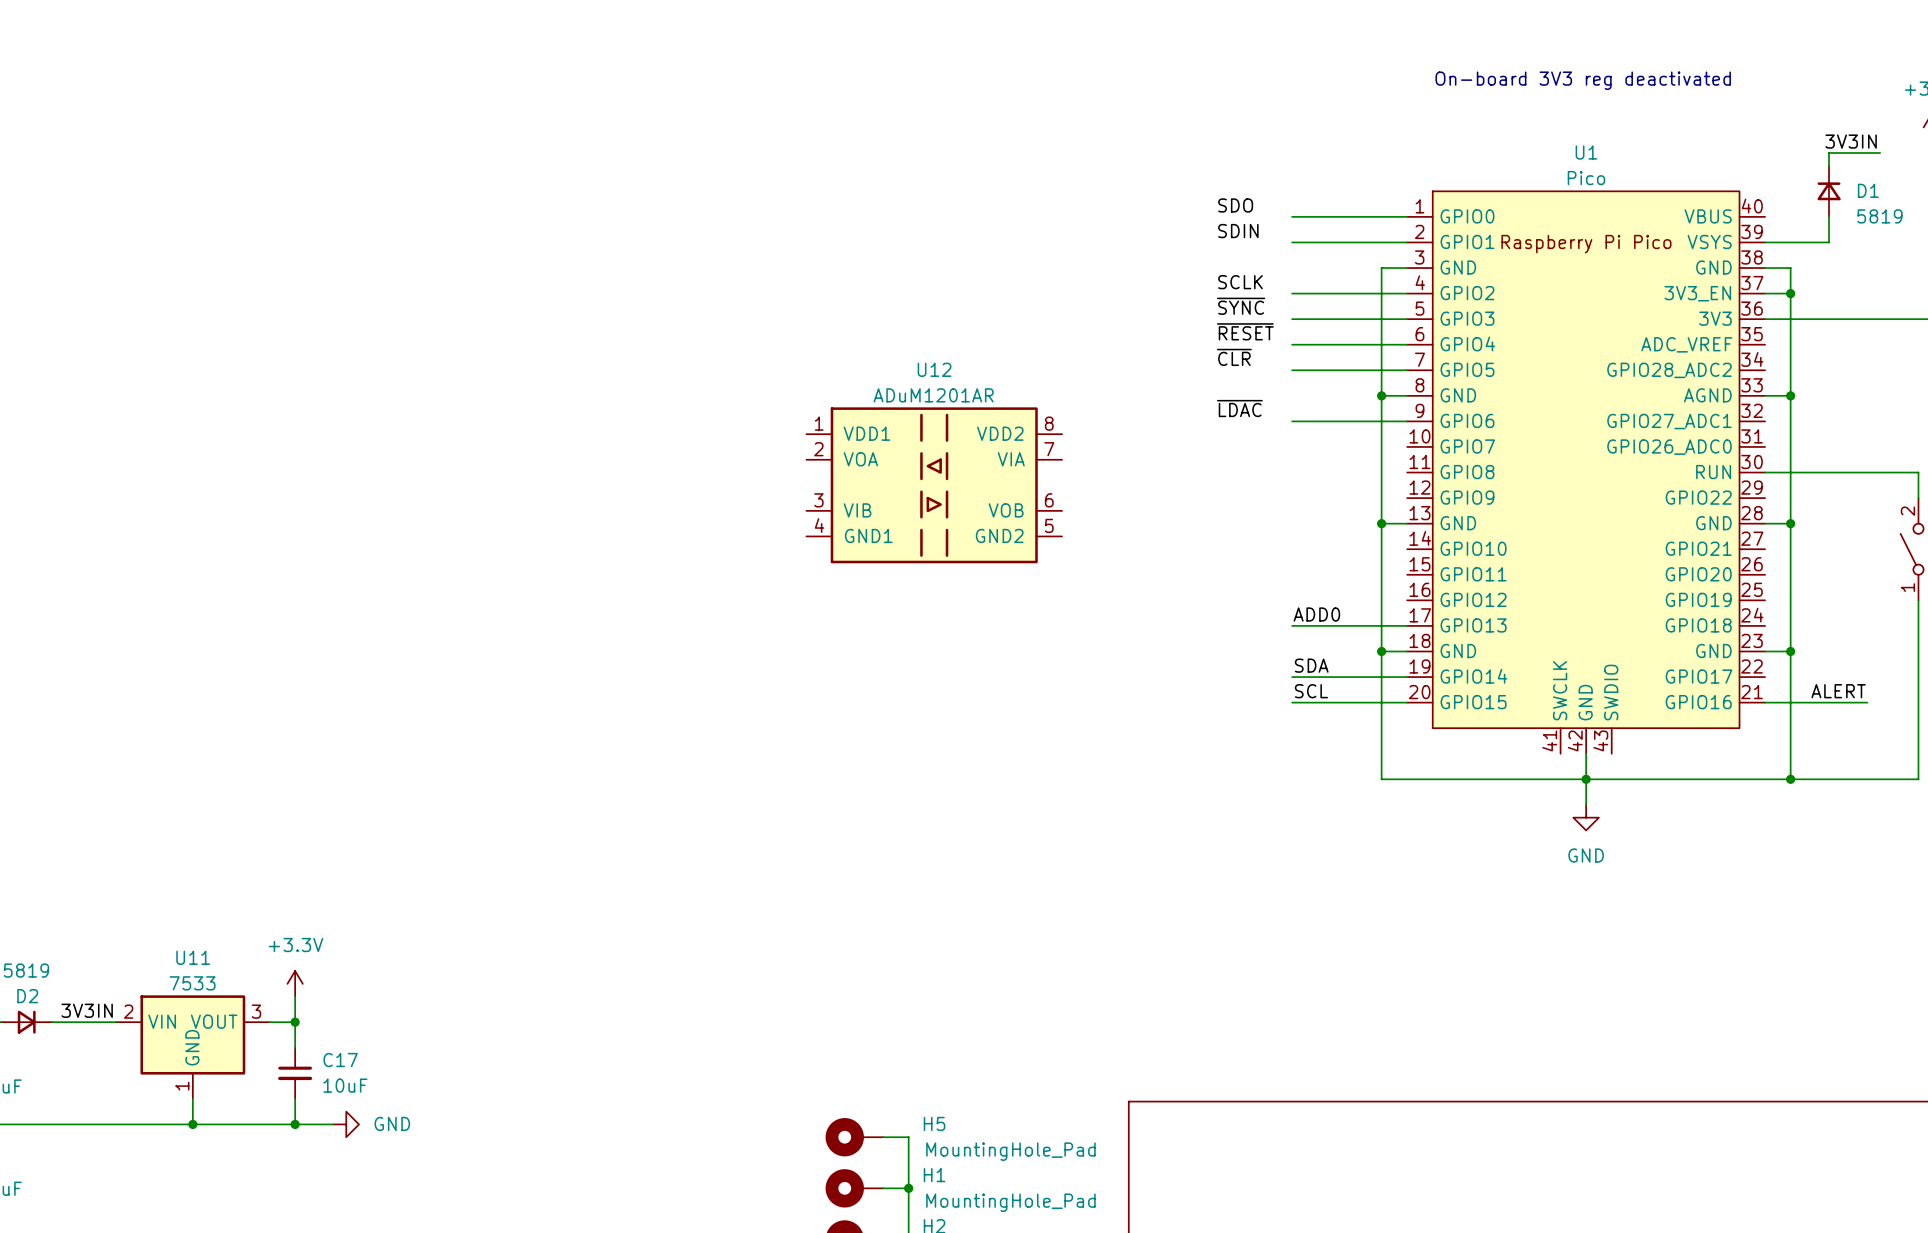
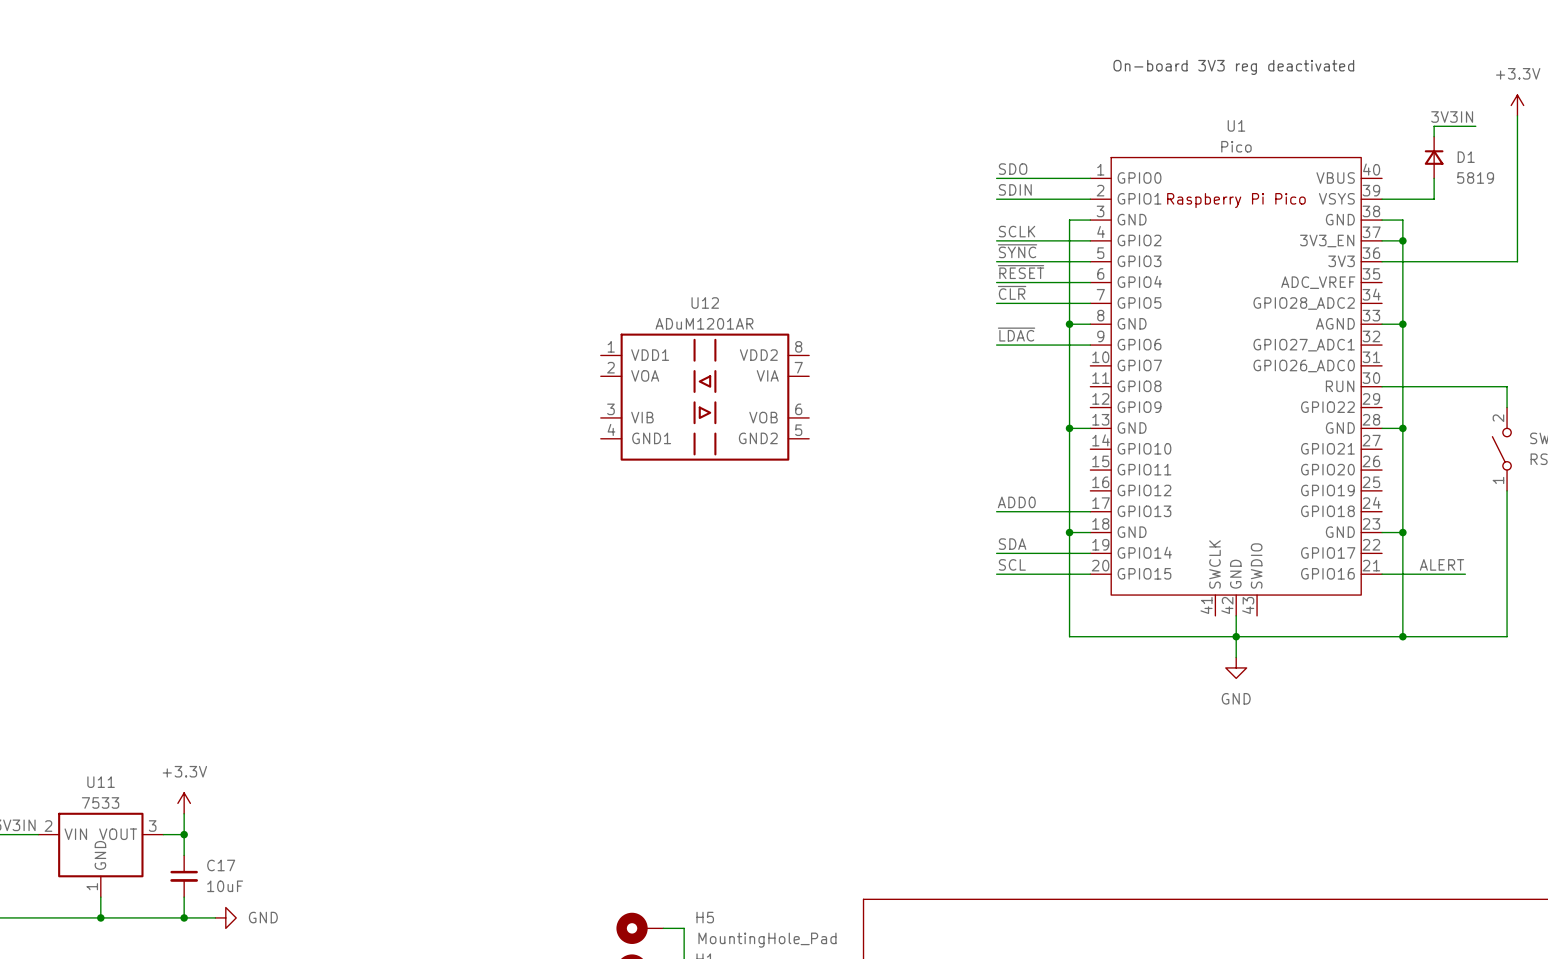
label position: SDO (1235, 205) -> SDO (1013, 169)
label position: SDIN (1238, 231) -> SDIN (1015, 189)
label position: SCLK (1240, 282) -> SCLK (1017, 231)
label position: ~{SYNC} (1241, 306) -> ~{SYNC} (1017, 251)
label position: ~{RESET} (1245, 331) -> ~{RESET} (1021, 272)
label position: ~{CLR} (1234, 357) -> ~{CLR} (1012, 292)
label position: ~{LDAC} (1239, 408) -> ~{LDAC} (1016, 334)

